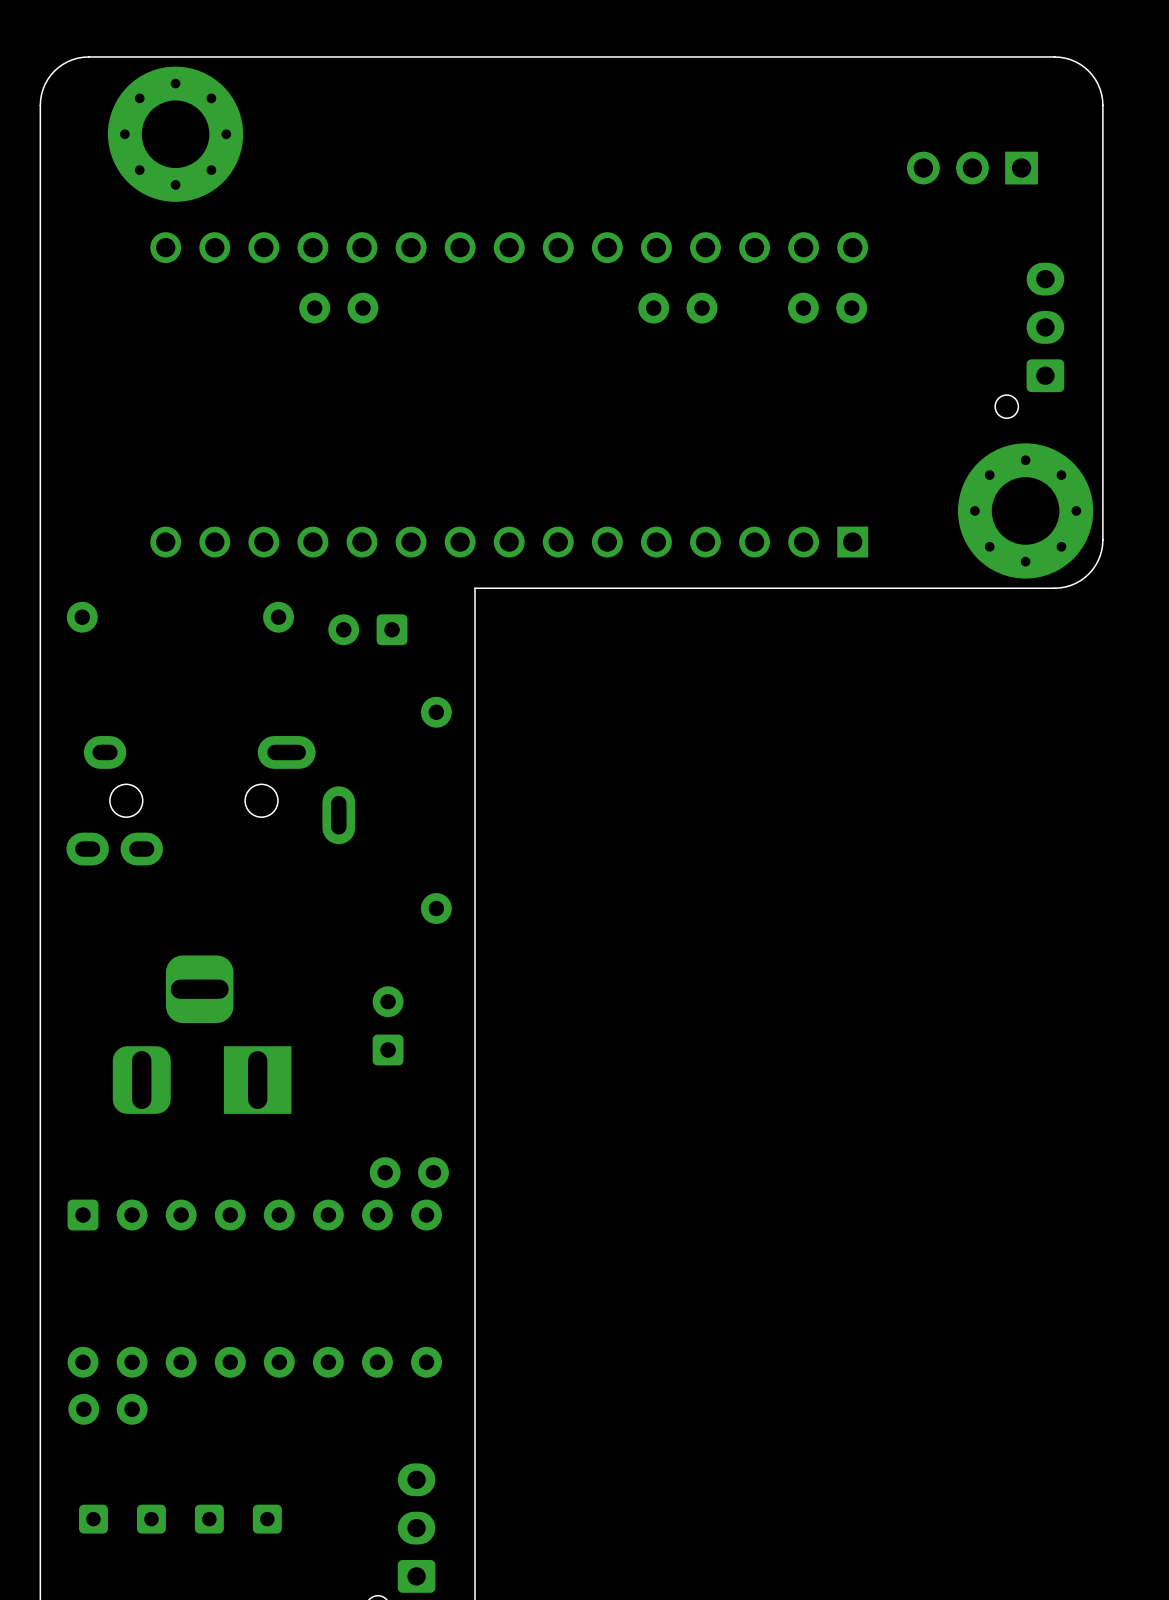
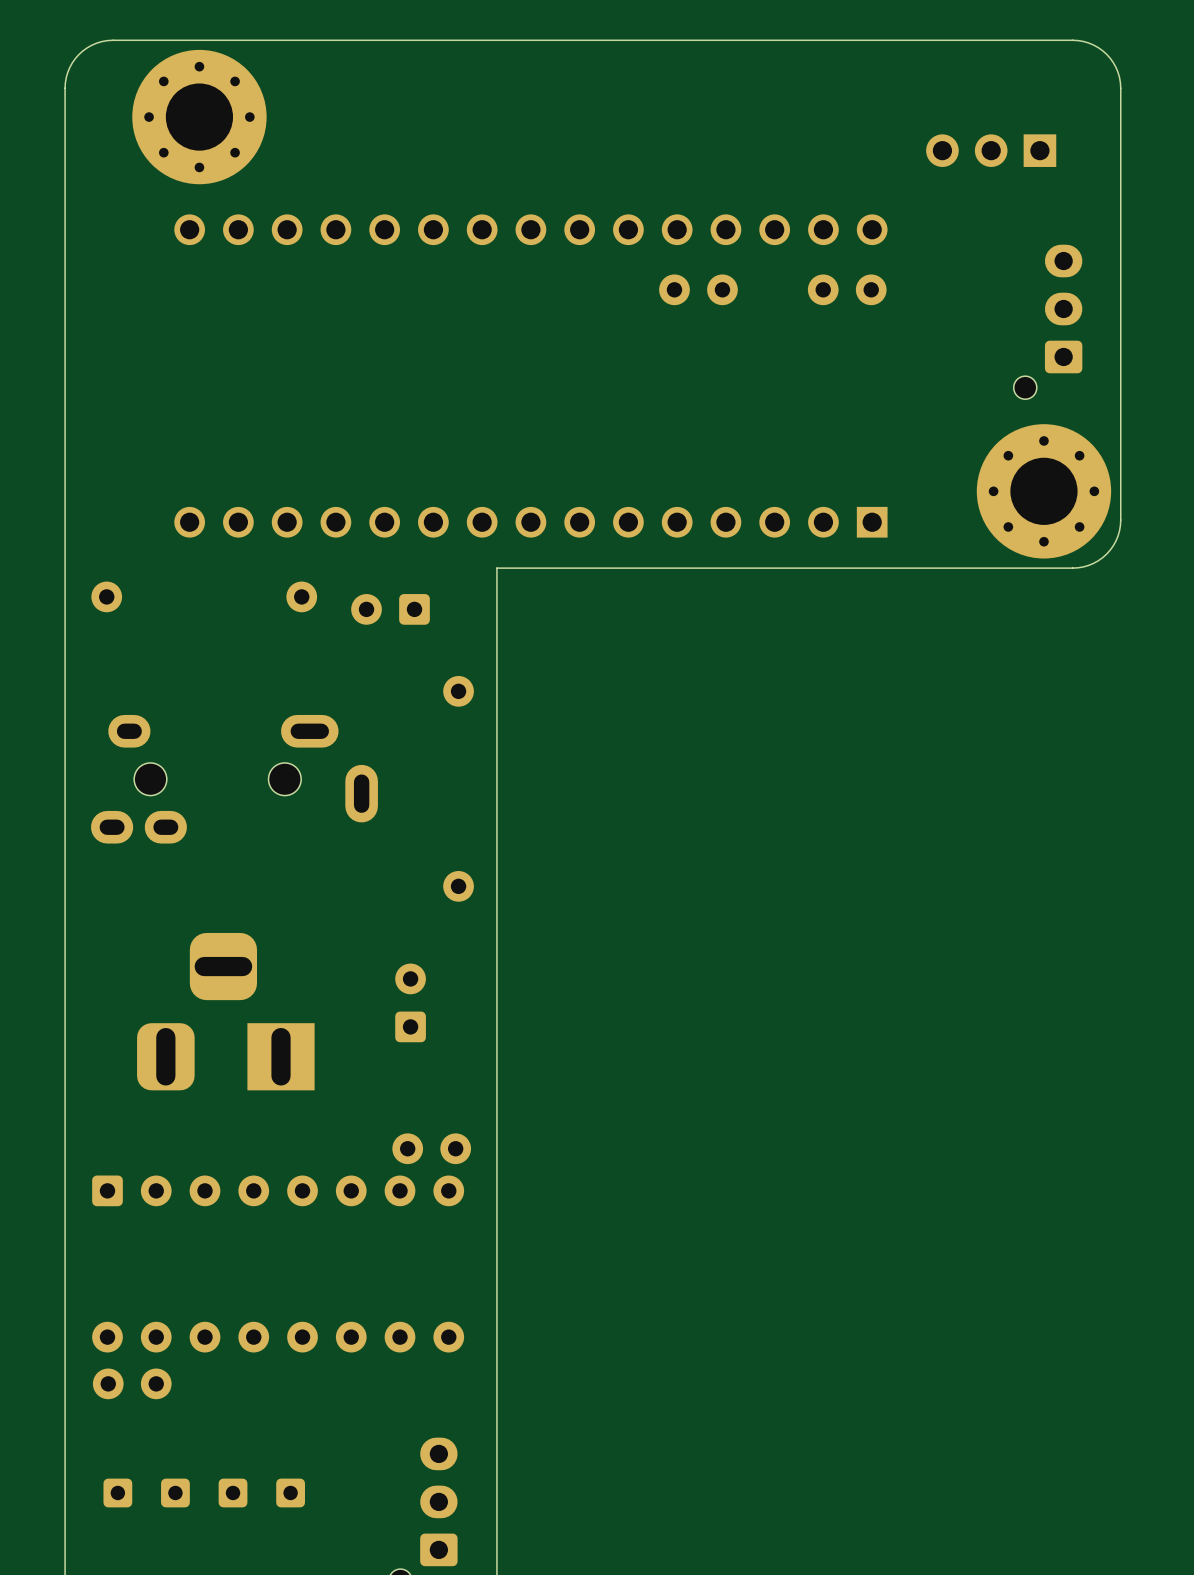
part: (338, 308) -> none

